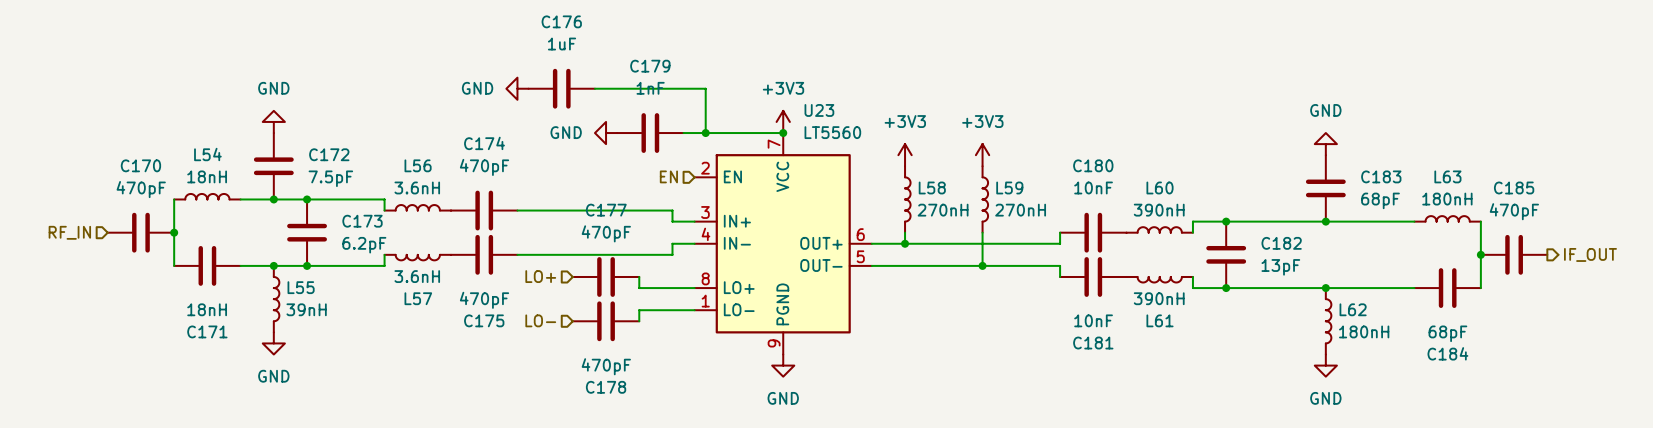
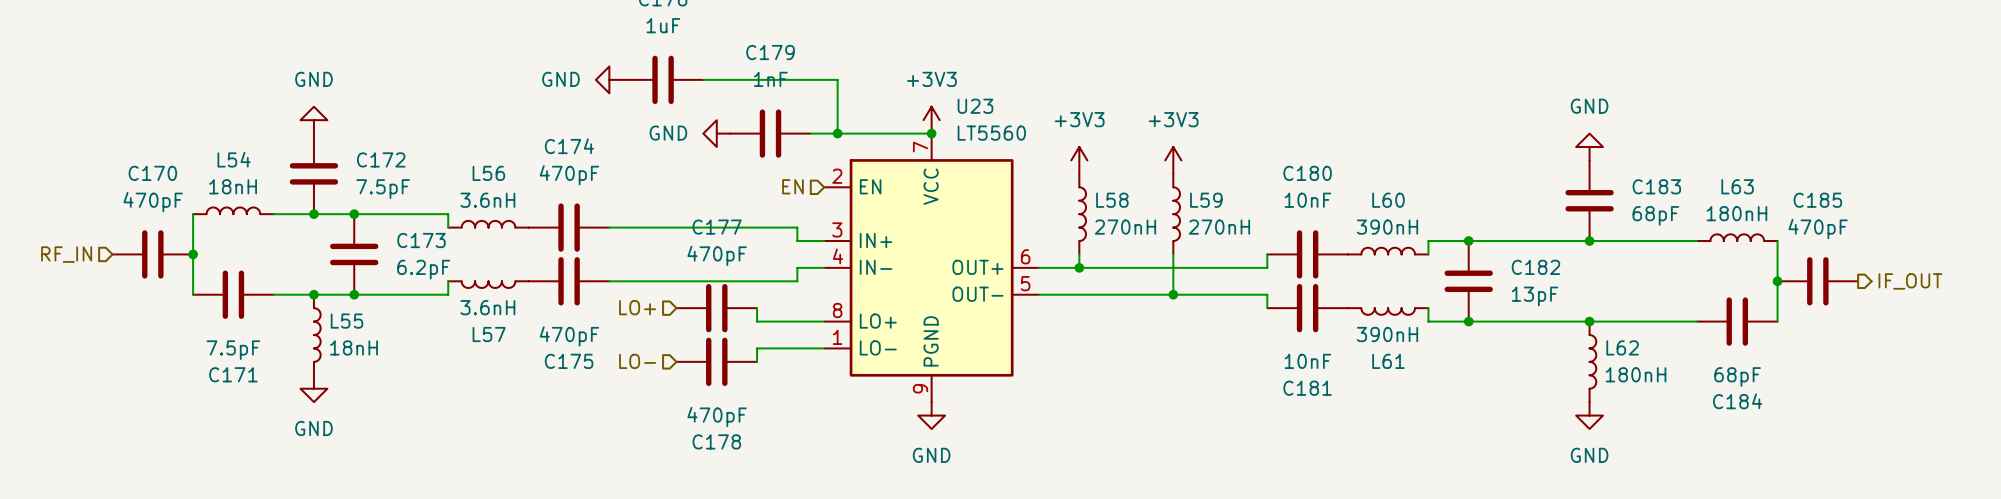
C171 value: 18nH (207, 309) -> 7.5pF (233, 350)
L55 value: 39nH (306, 309) -> 18nH (354, 347)

